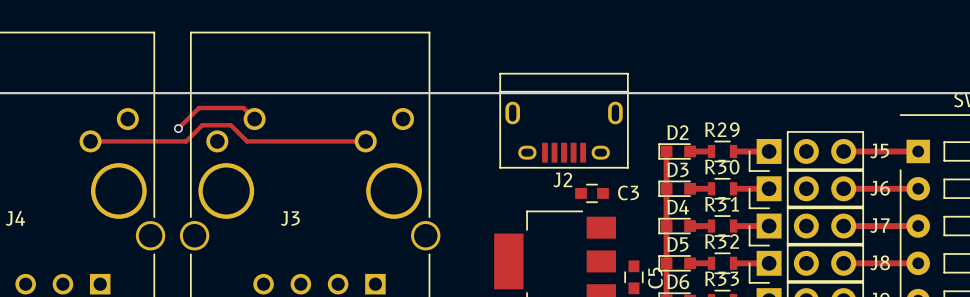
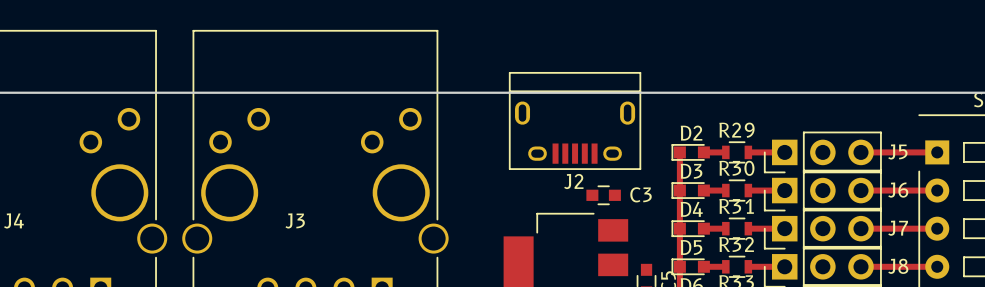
track: (254, 119) (243, 108) (199, 108) (178, 128) -> none
via: (178, 128) -> none
track: (90, 141) (186, 141) (202, 125) (230, 125) (247, 141) (365, 141) -> none

